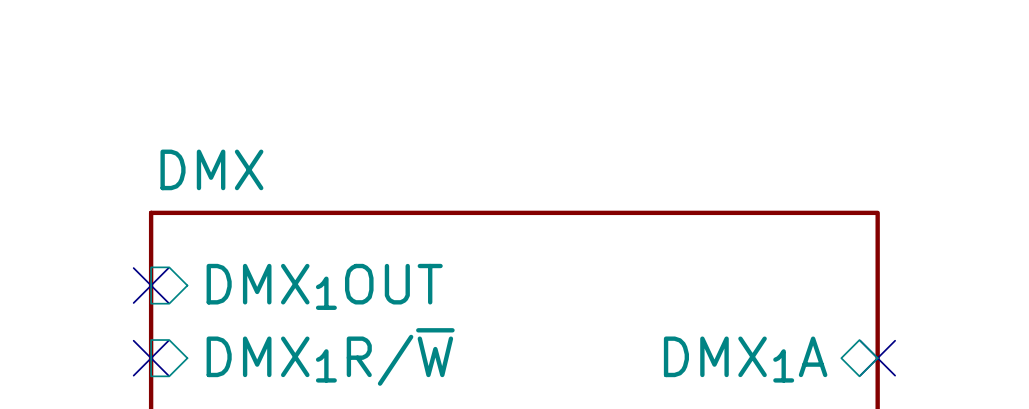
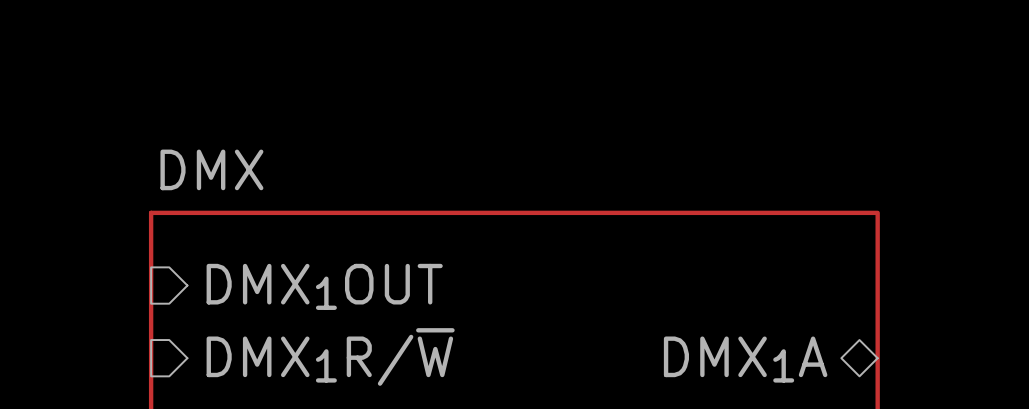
no-connect mark: (151, 285) -> none
no-connect mark: (151, 358) -> none
no-connect mark: (877, 358) -> none

